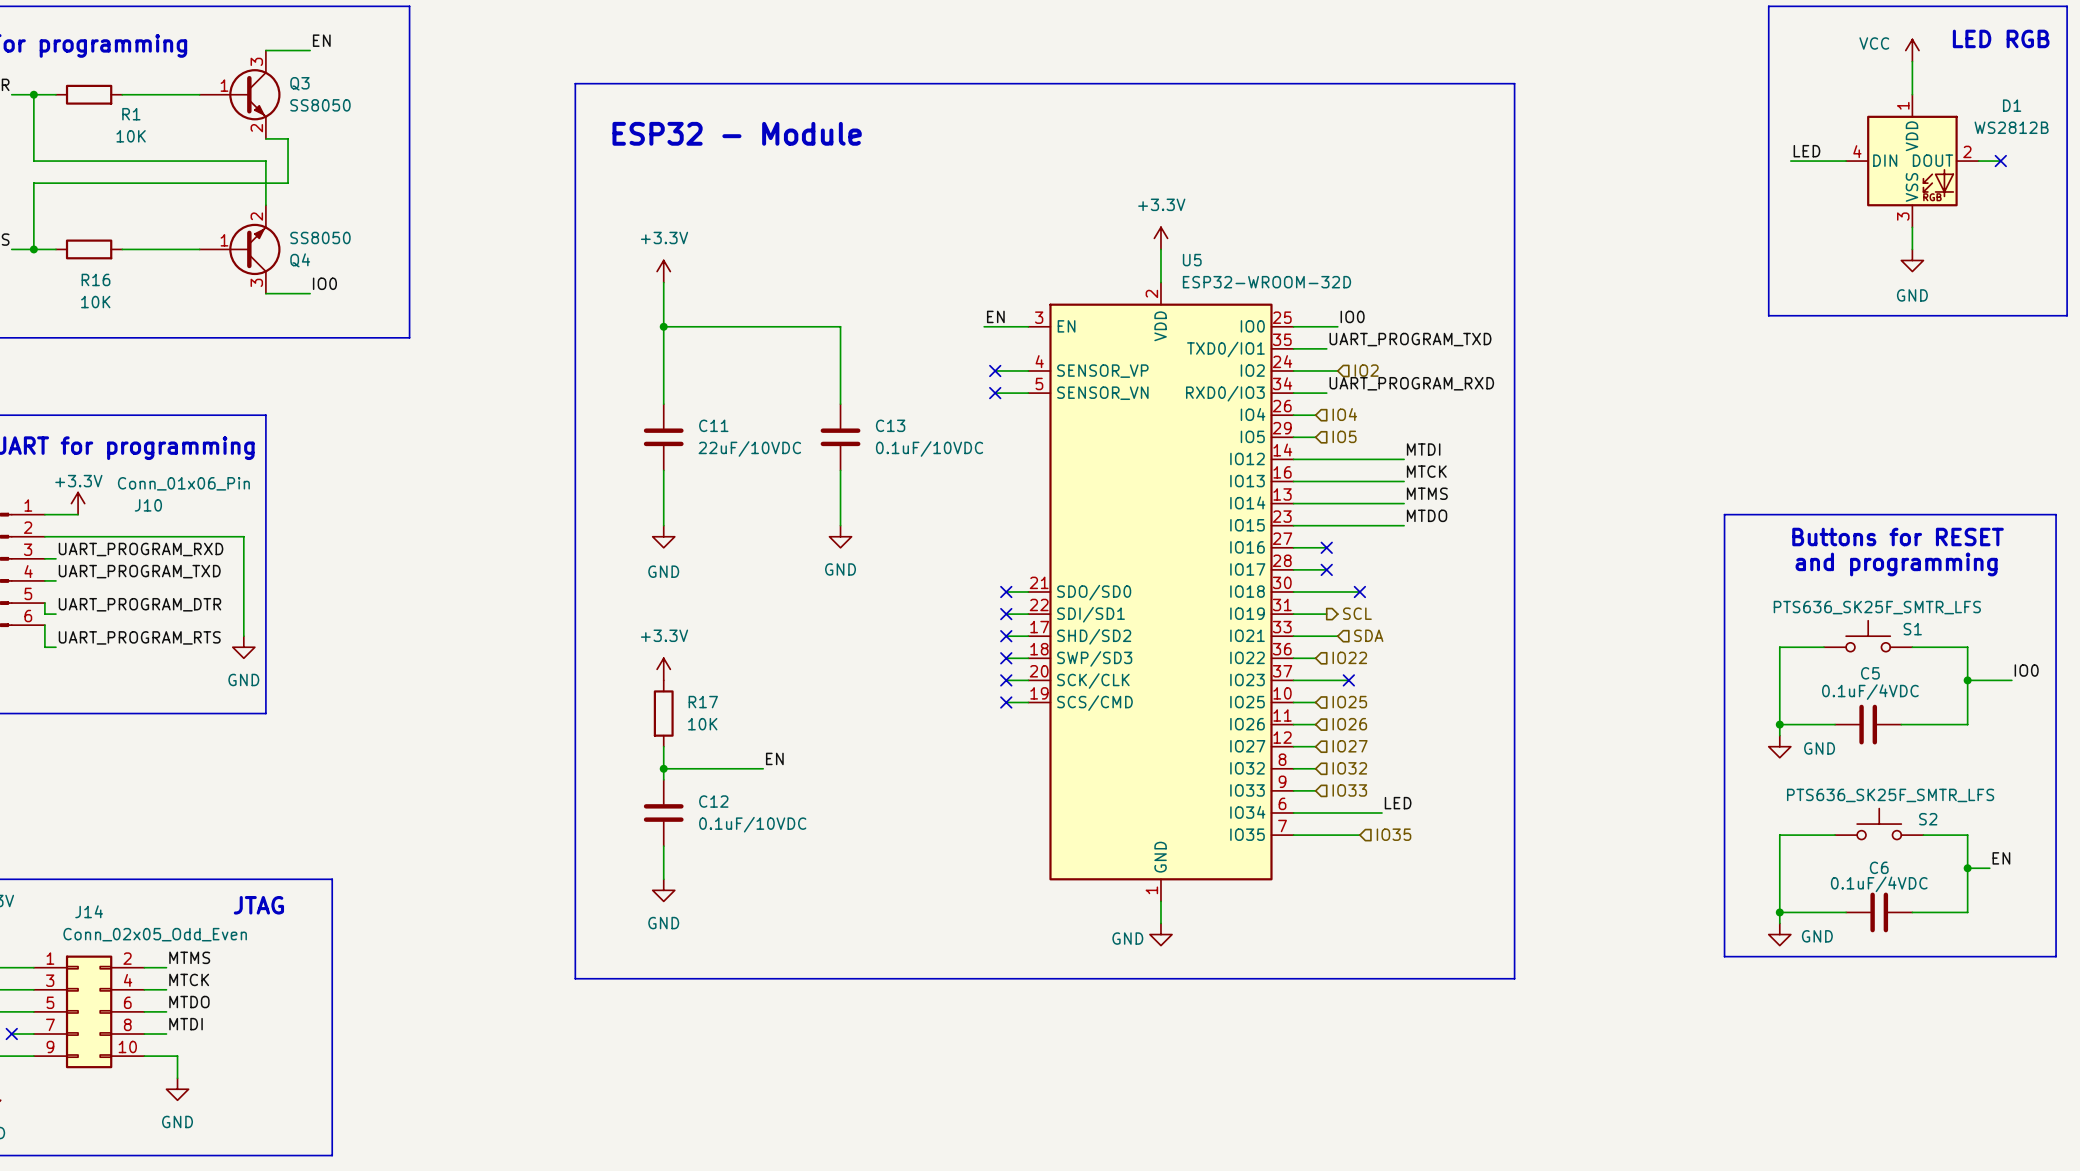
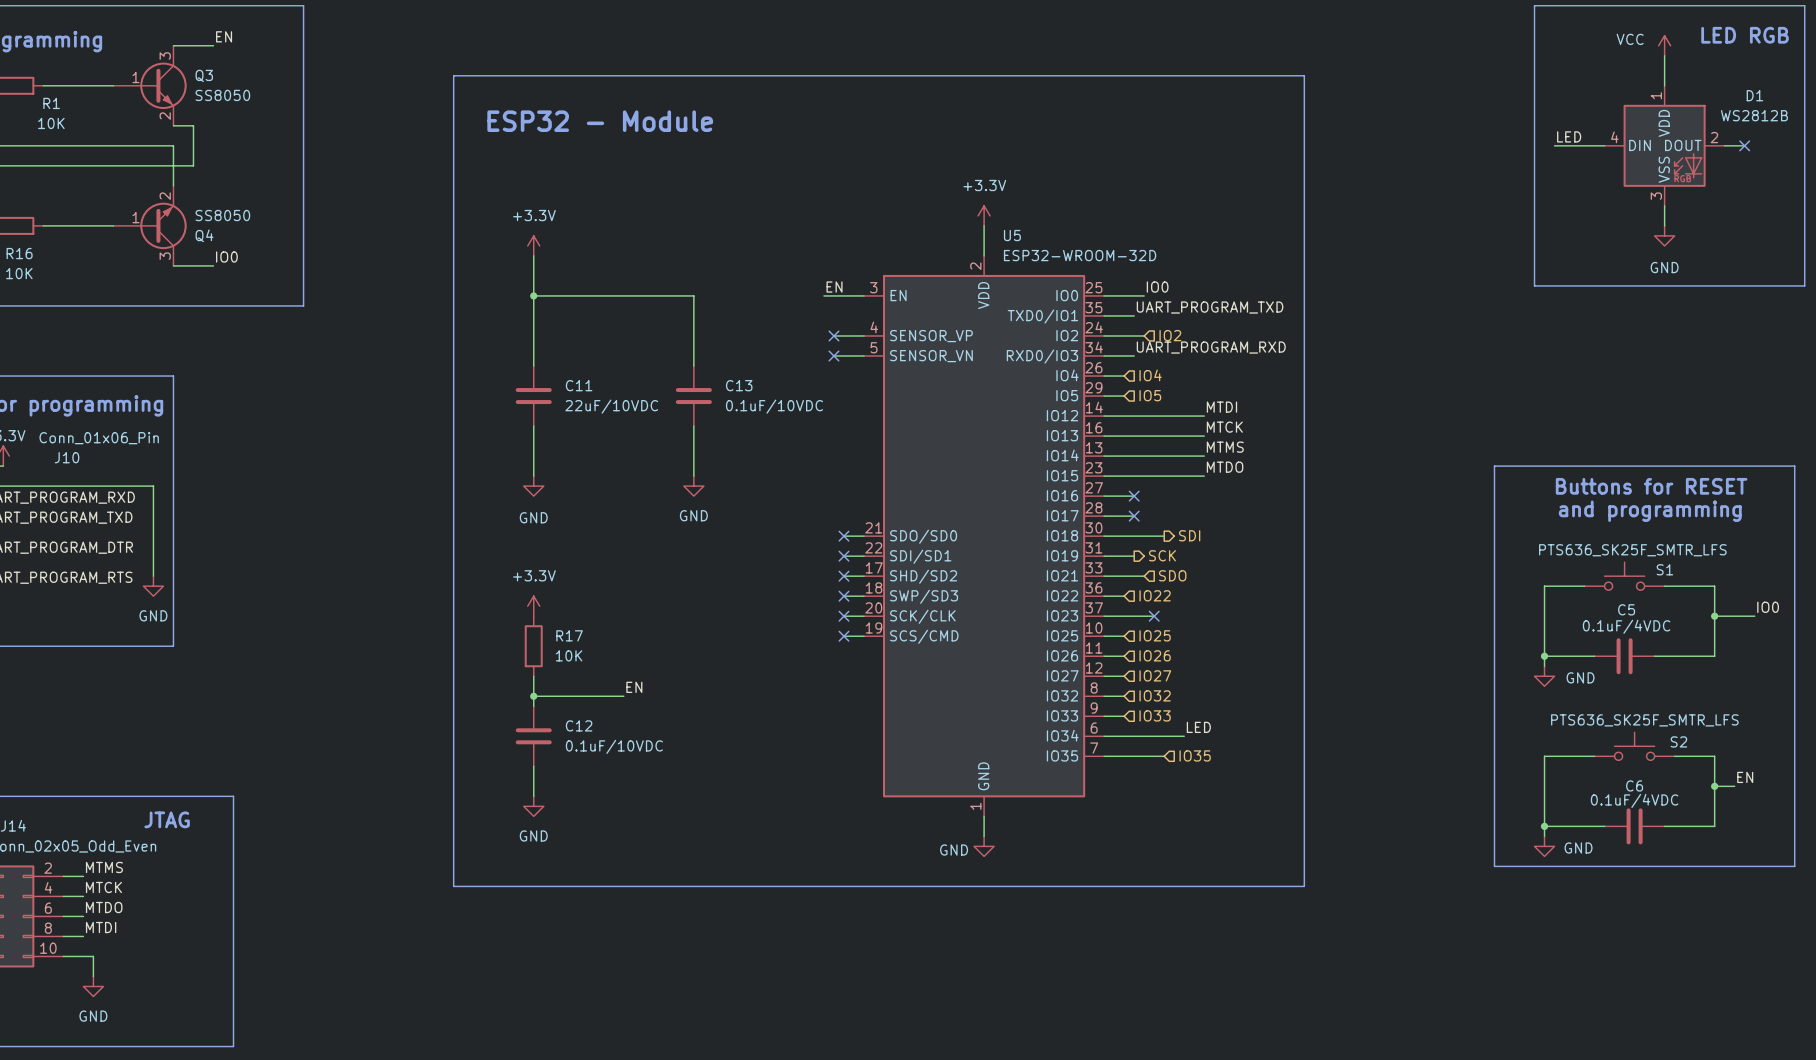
no-connect mark: (1359, 591) -> none
hierarchical label: none -> SDI (1189, 535)
hierarchical label: SCL (1357, 613) -> SCK (1162, 555)
hierarchical label: SDA (1368, 635) -> SDO (1172, 575)

